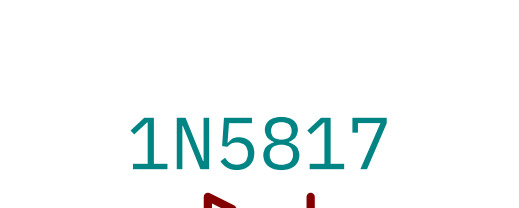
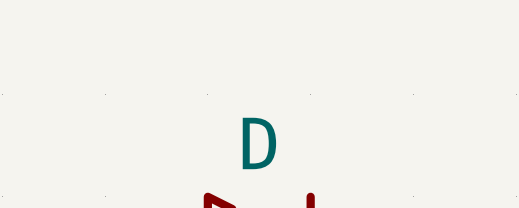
part value: 1N5817 (258, 143) -> D (259, 143)

